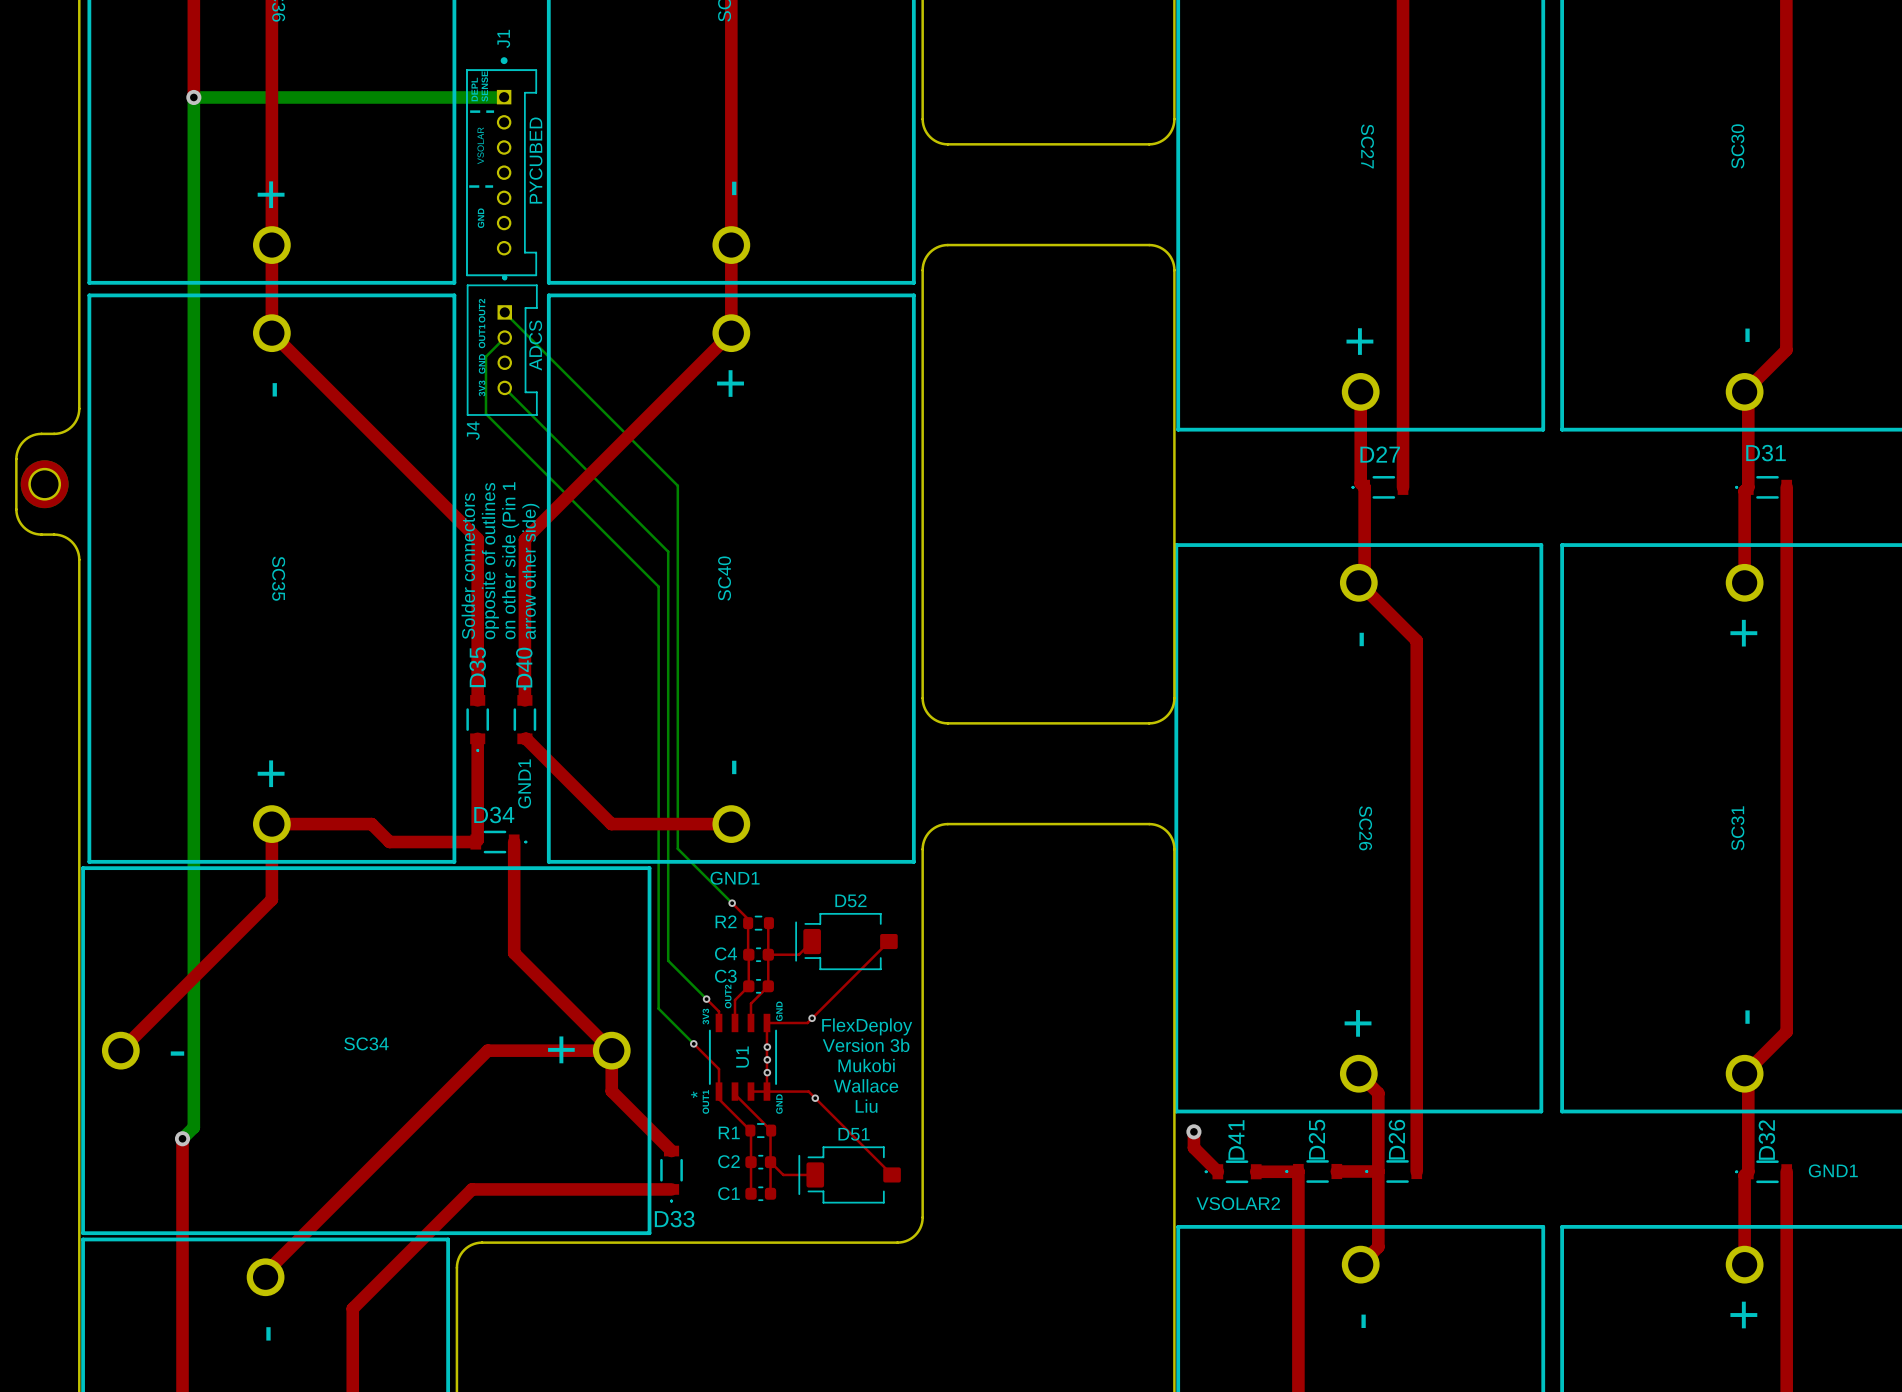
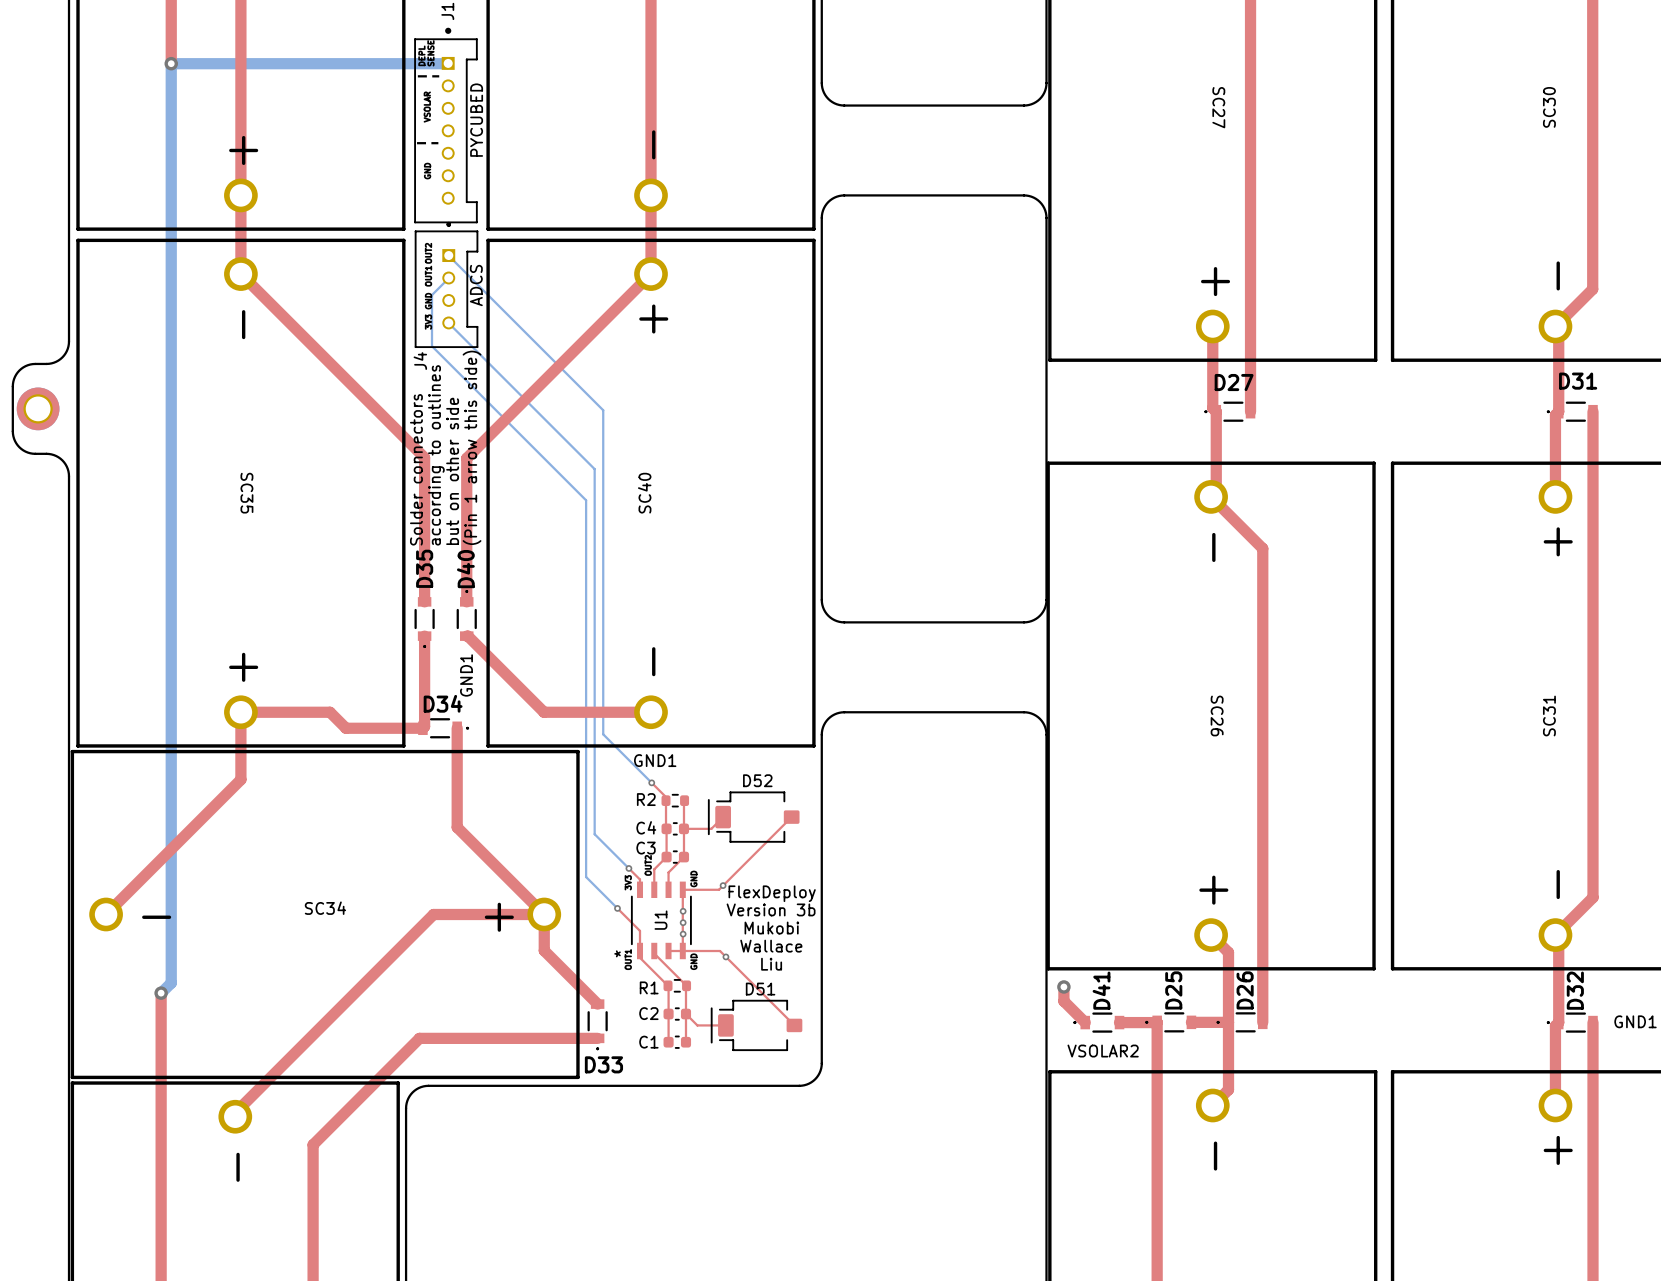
text: on other side (Pin 1 (510, 560) -> but on other side (452, 471)
text: opposite of outlines (490, 561) -> according to outlines (436, 455)
text: arrow other side) (530, 571) -> (Pin 1 arrow this side) (472, 447)

